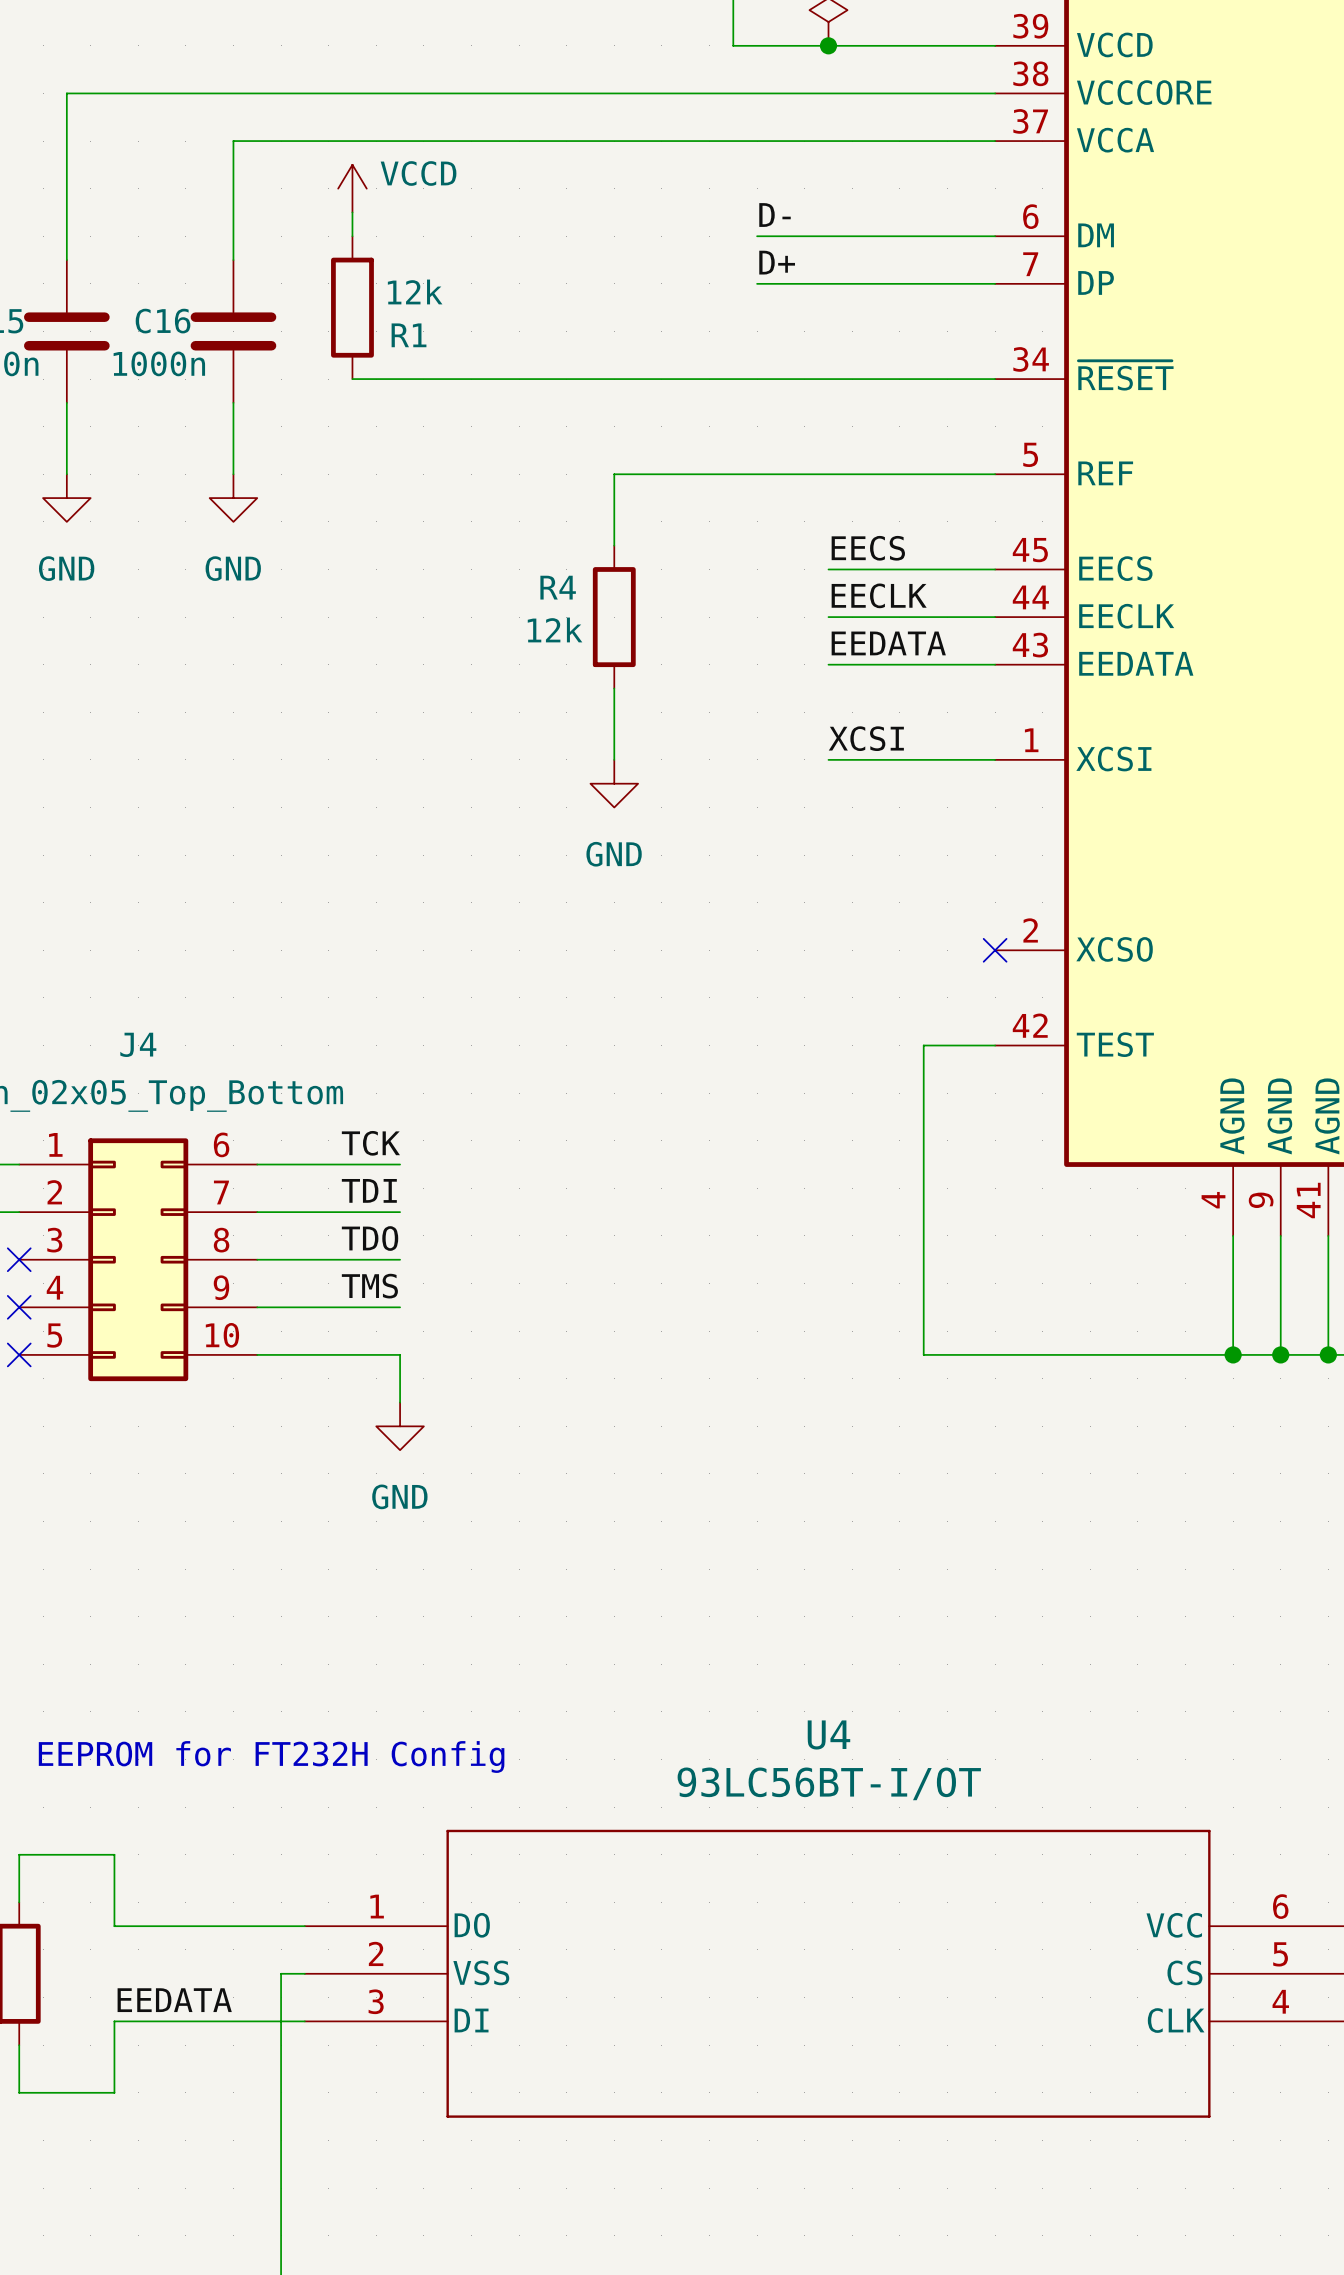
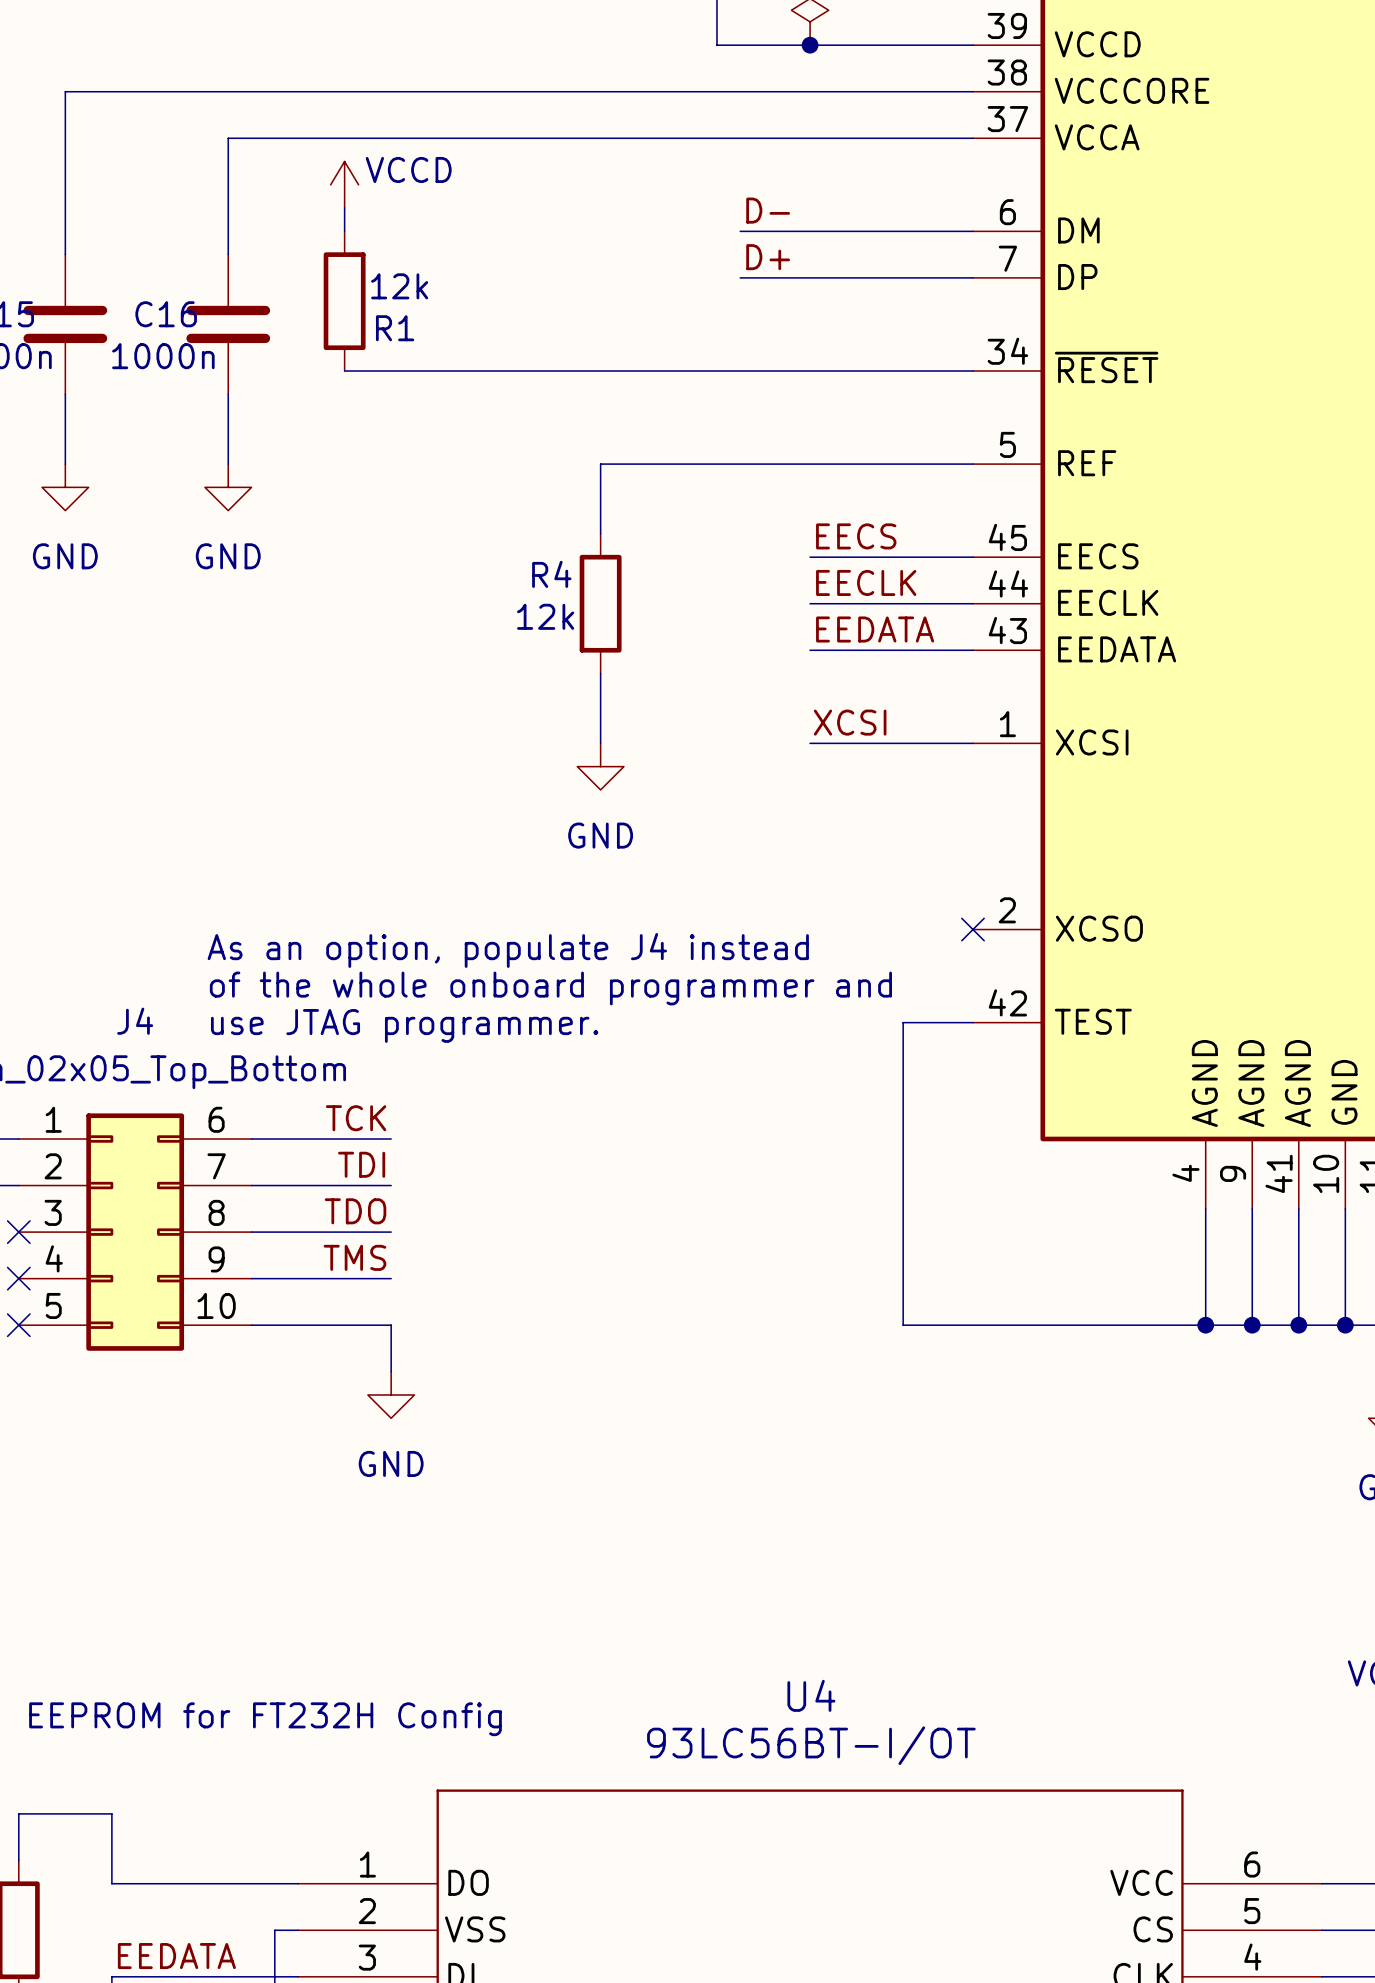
text: none -> As an option, populate J4 instead (508, 950)
text: none -> of the whole onboard programmer and (550, 988)
text: none -> use JTAG programmer. (404, 1025)

